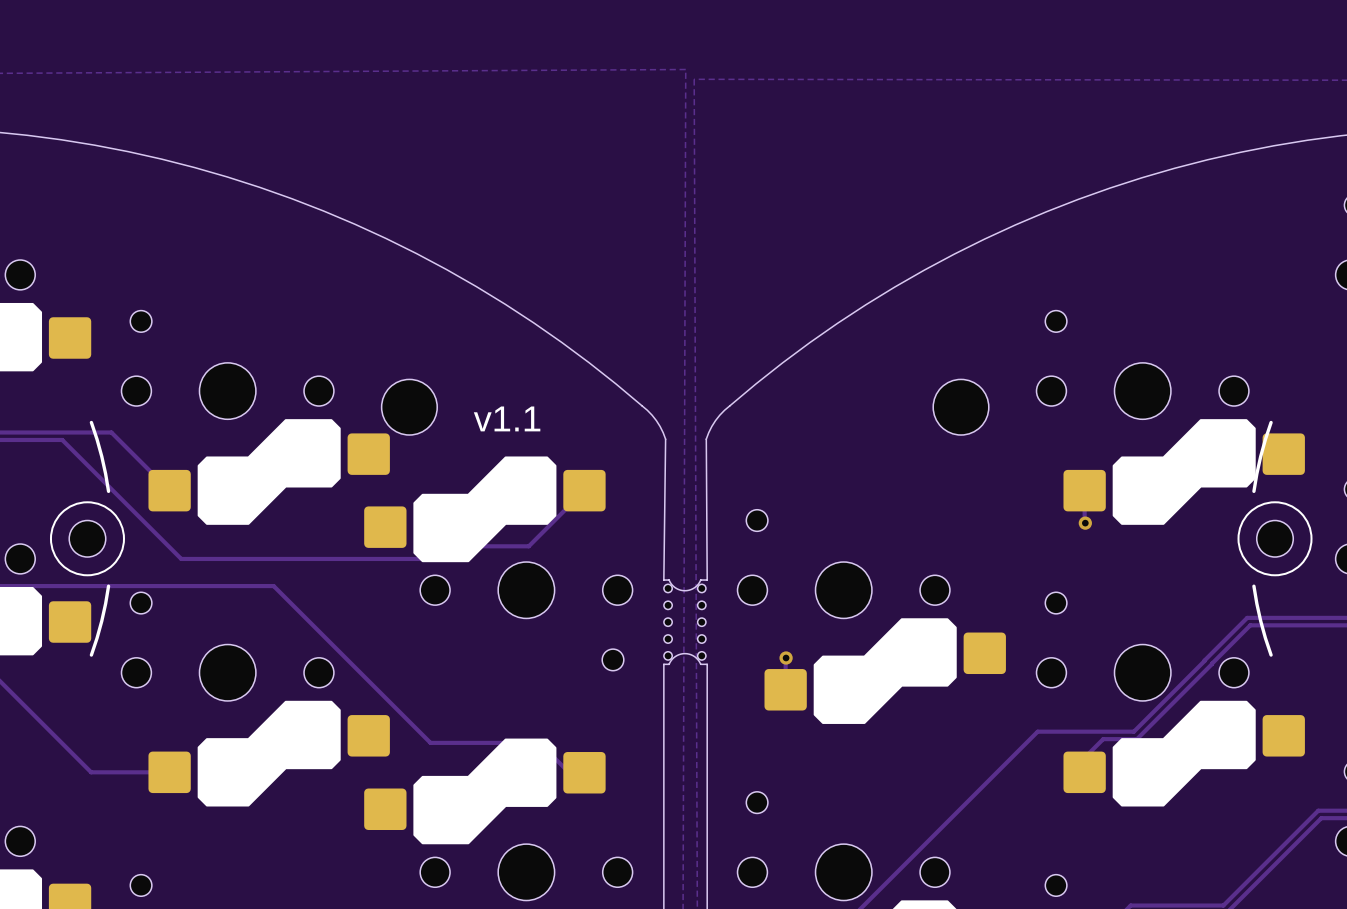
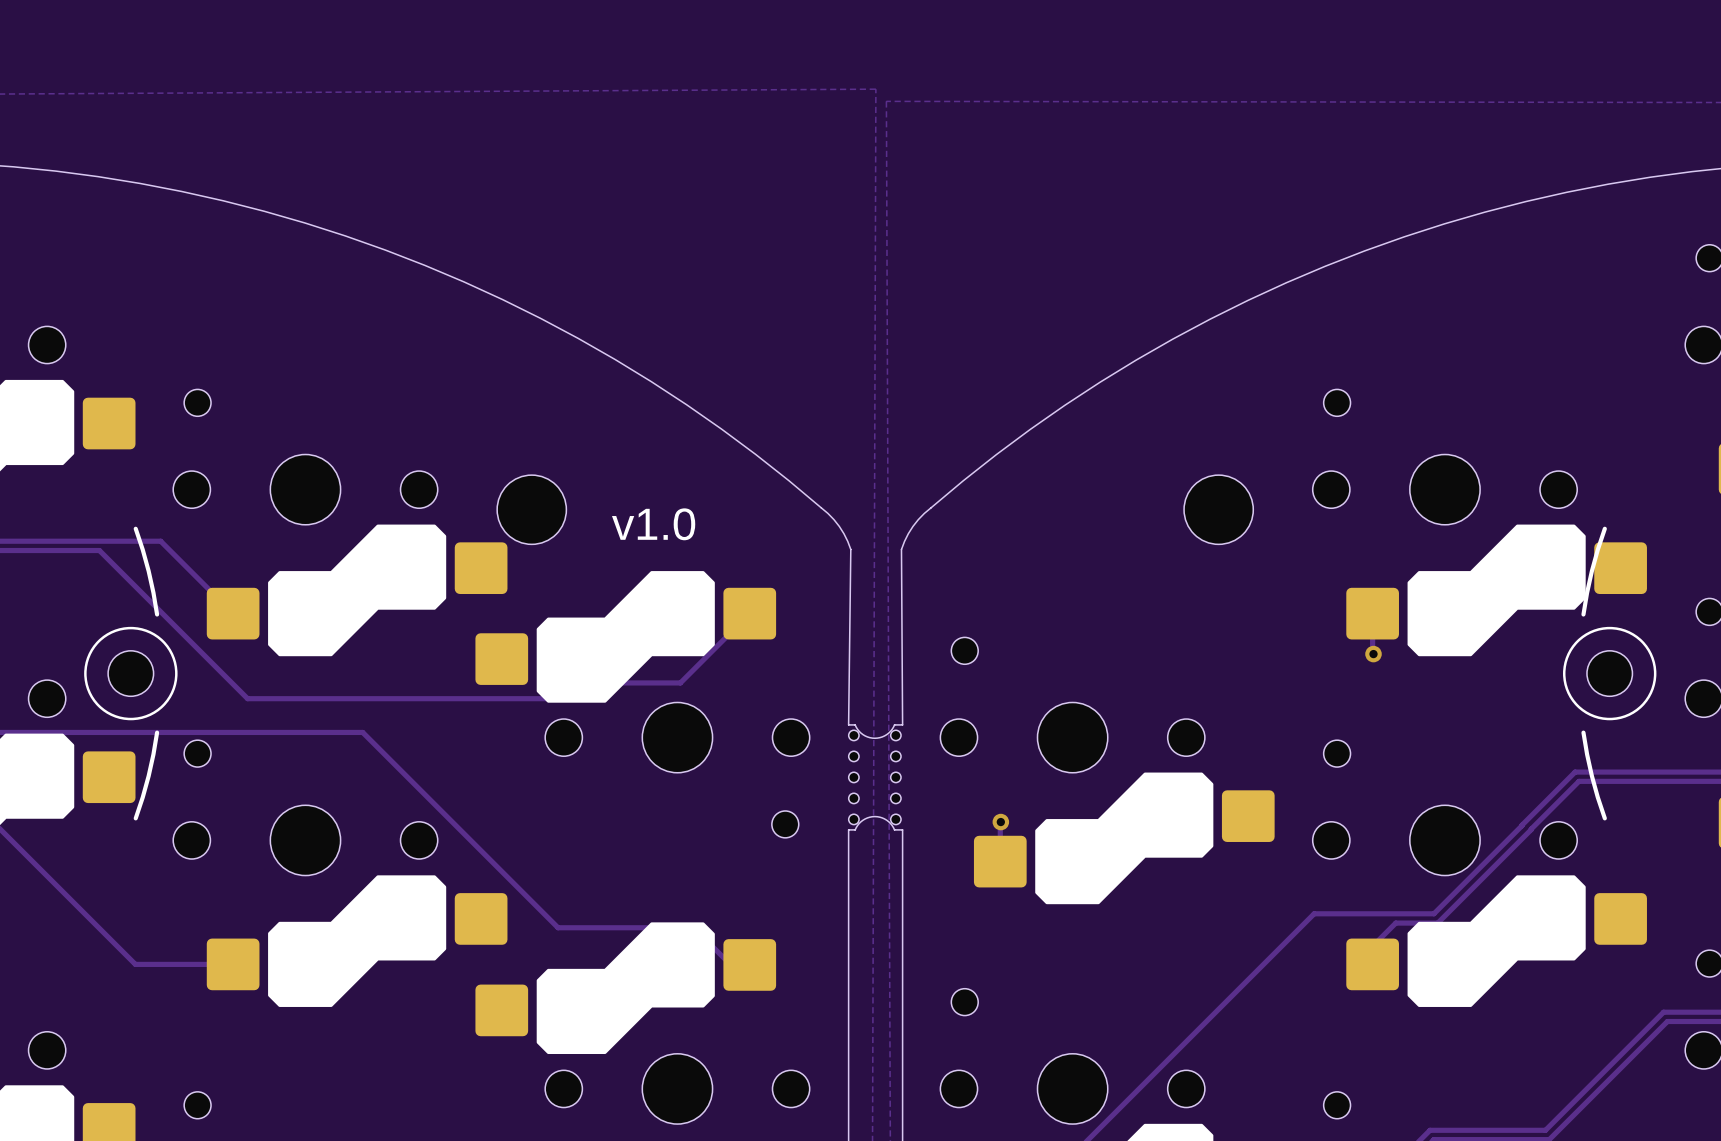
text: v1.1 (507, 418) -> v1.0 (653, 524)

